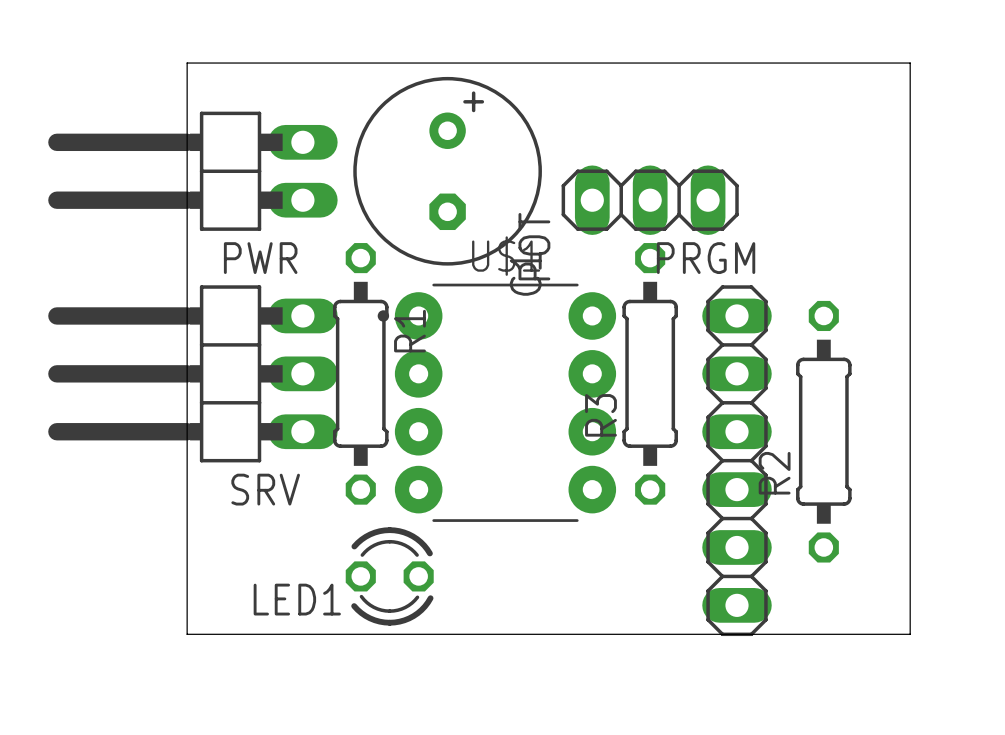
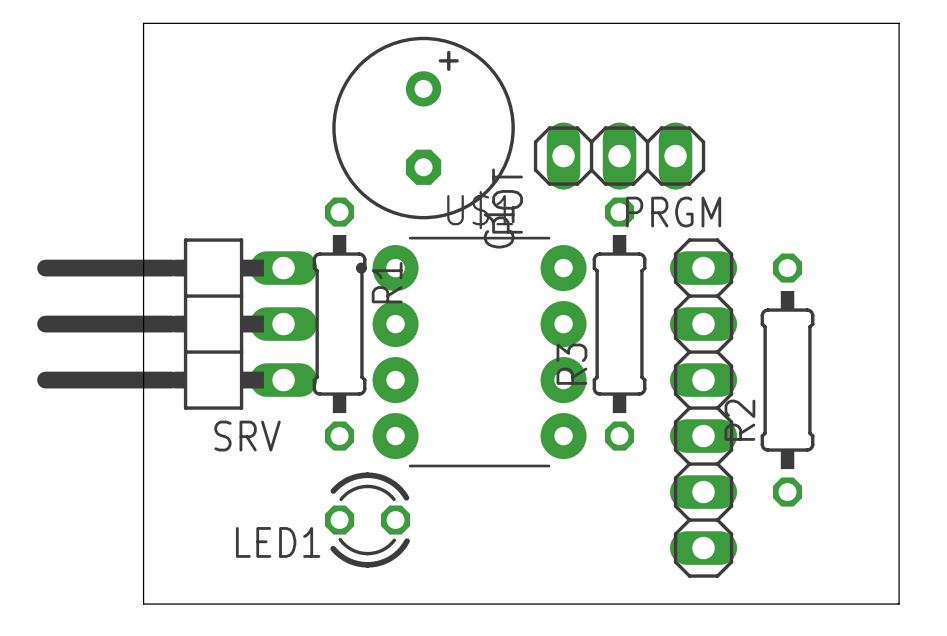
board edge: (187, 63) (187, 634) (910, 634) (910, 63) -> (171, 23) (143, 23) (143, 604) (899, 604) (899, 23) (871, 23)
PWR: (192, 171) -> none

